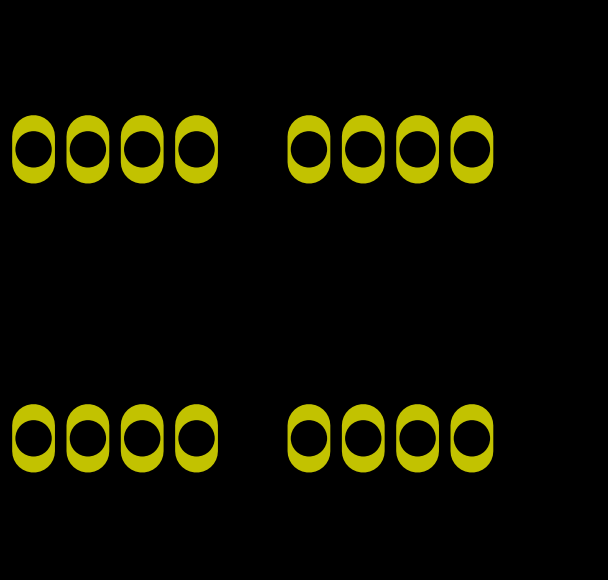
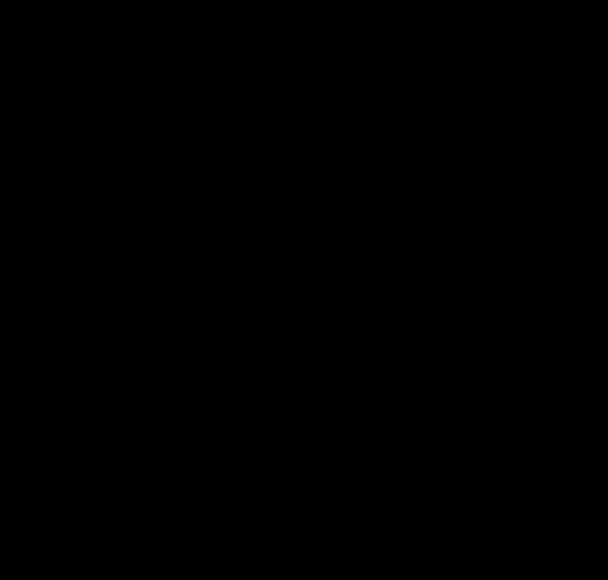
part: (115, 149) -> none
part: (390, 149) -> none
part: (115, 438) -> none
part: (390, 438) -> none

